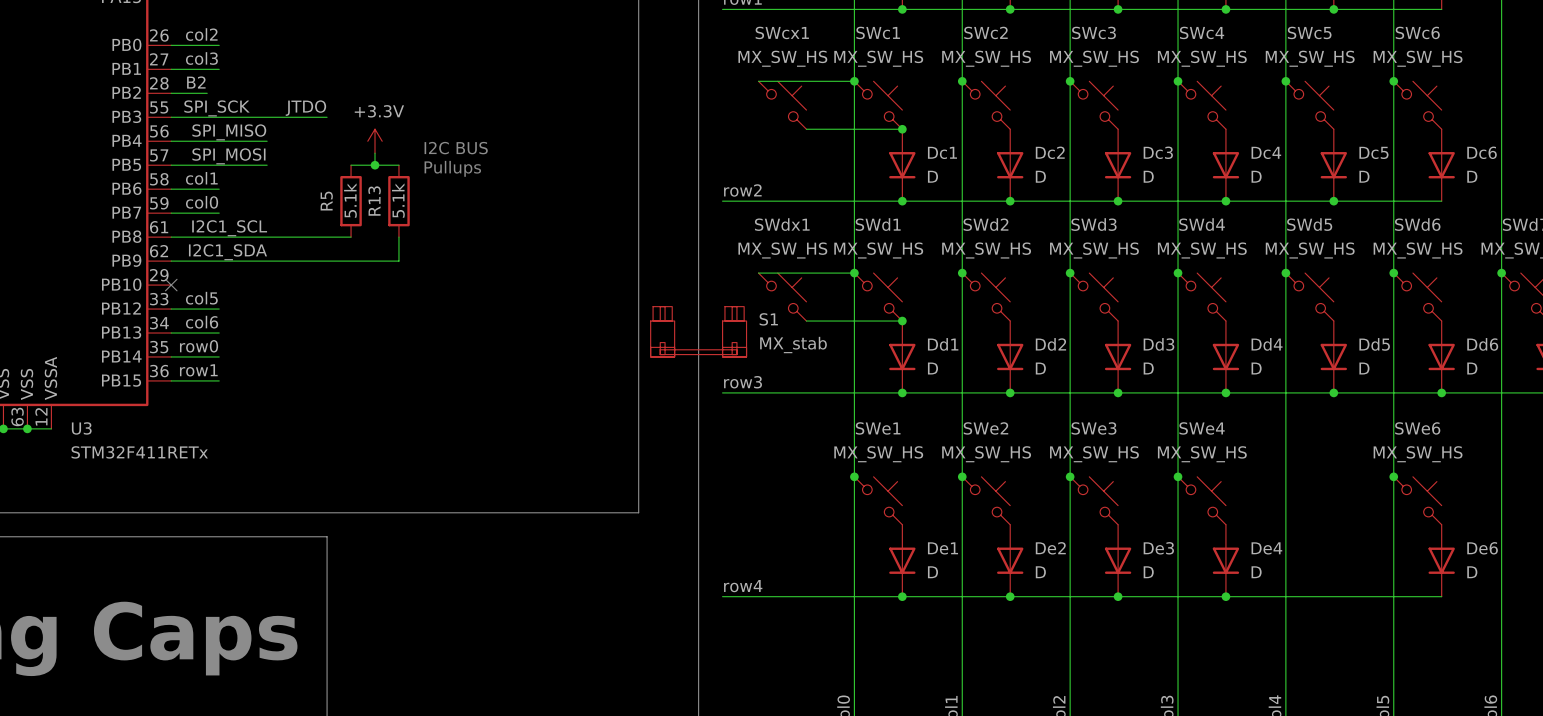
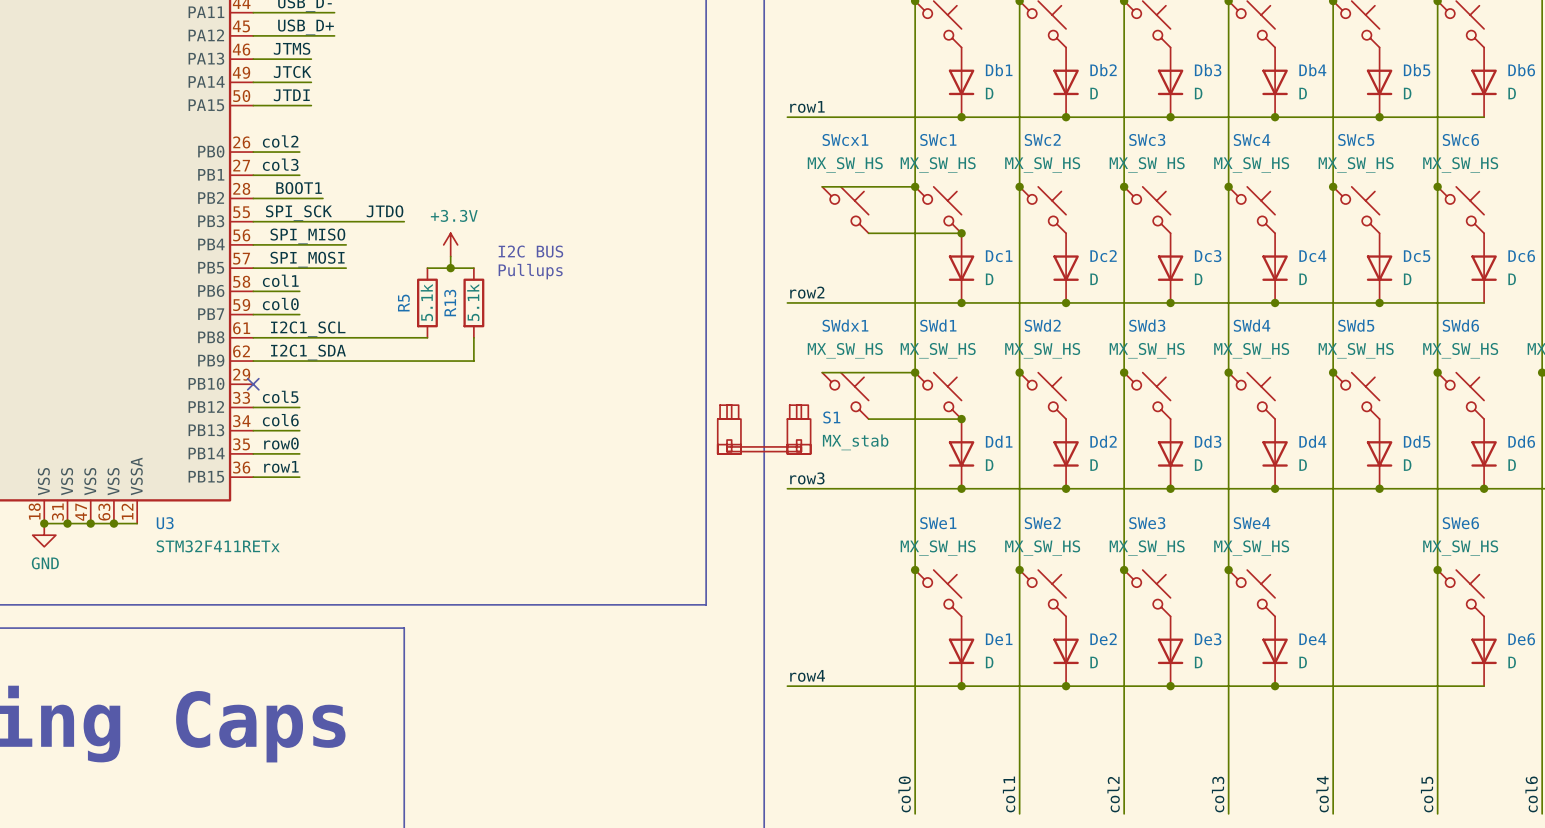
label: B2 (196, 82) -> none
label: none -> BOOT1 (299, 188)
wire: none -> (288, 198) (322, 198)

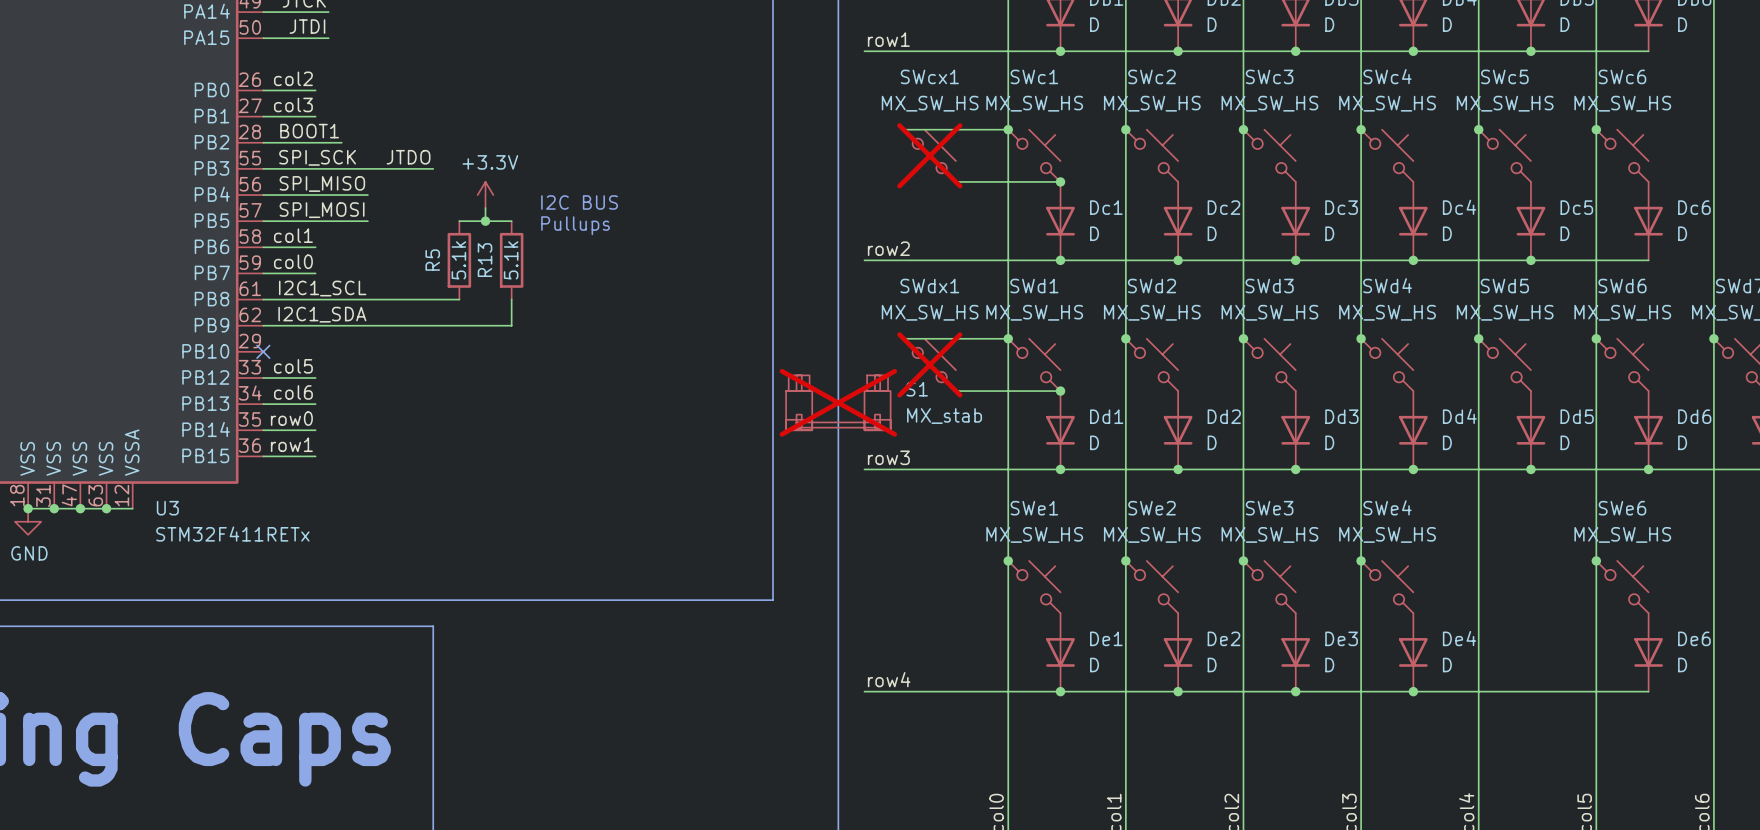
SWcx1 do-not-place cross: none -> (929, 155)
SWdx1 do-not-place cross: none -> (929, 364)
S1 do-not-place cross: none -> (838, 402)

